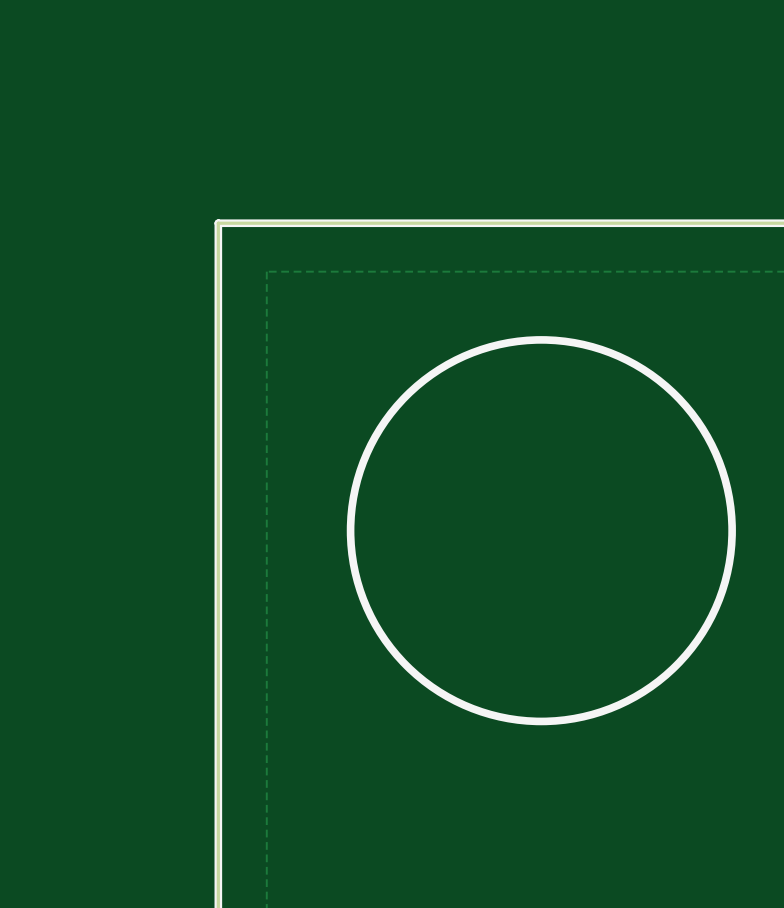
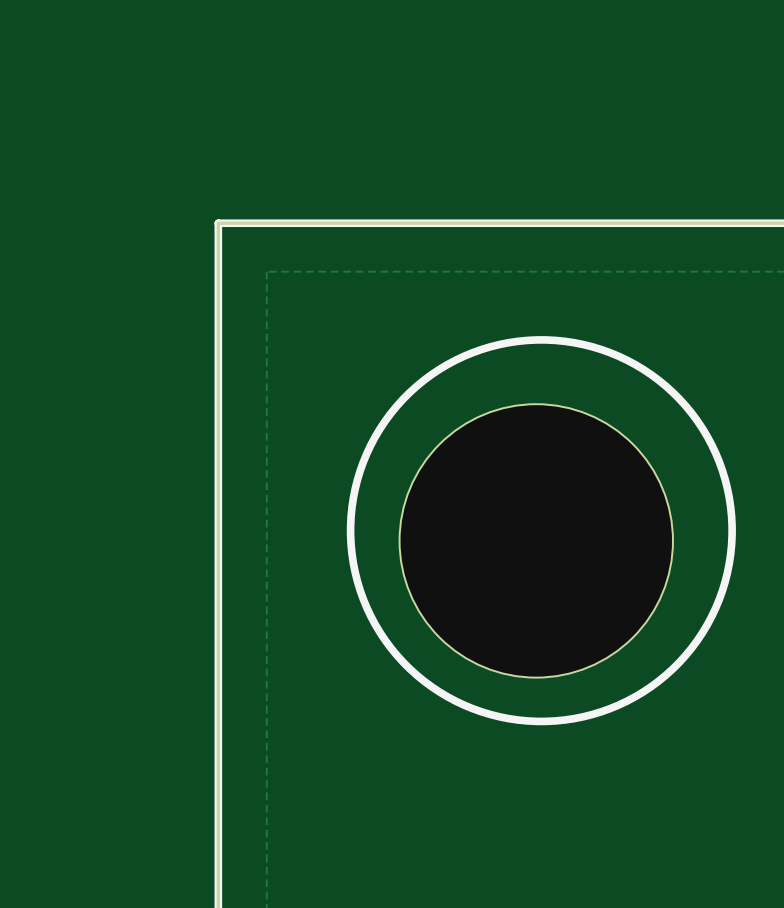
part: none -> (536, 540)

